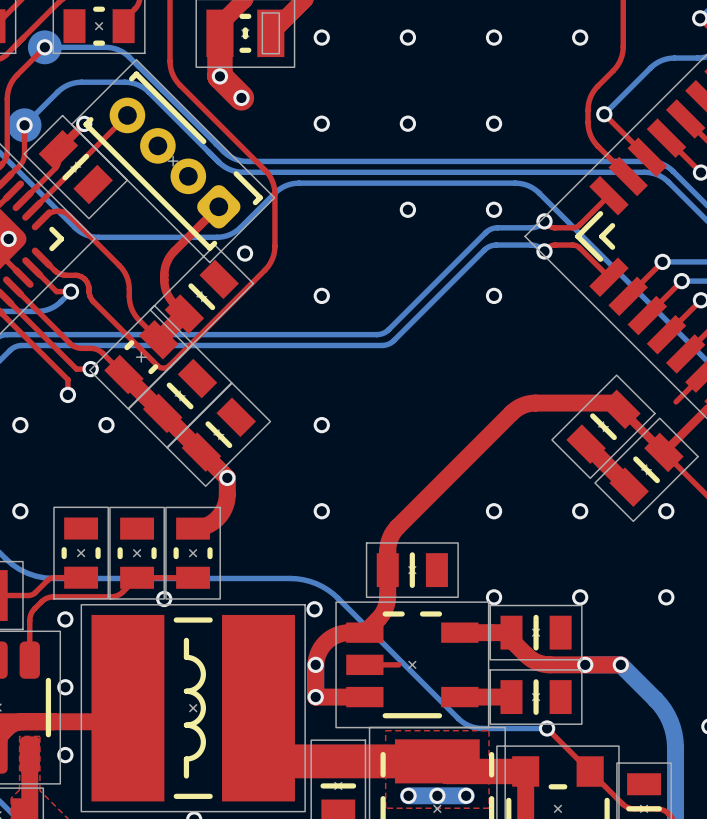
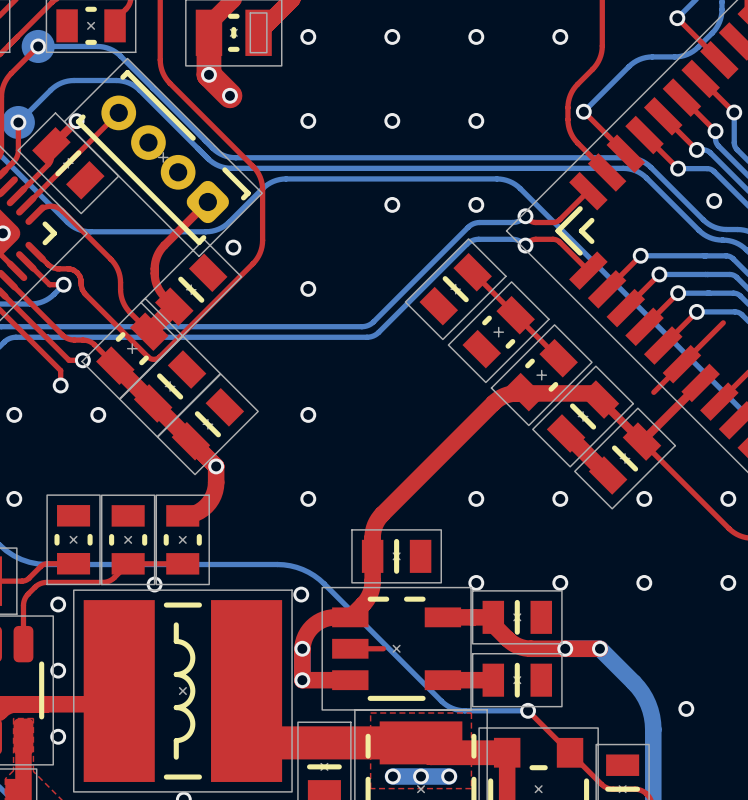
top track: none -> (472, 272) (558, 358)
via: (494, 295) -> none
part: none -> (455, 289)
part: none -> (498, 332)
part: none -> (541, 375)

